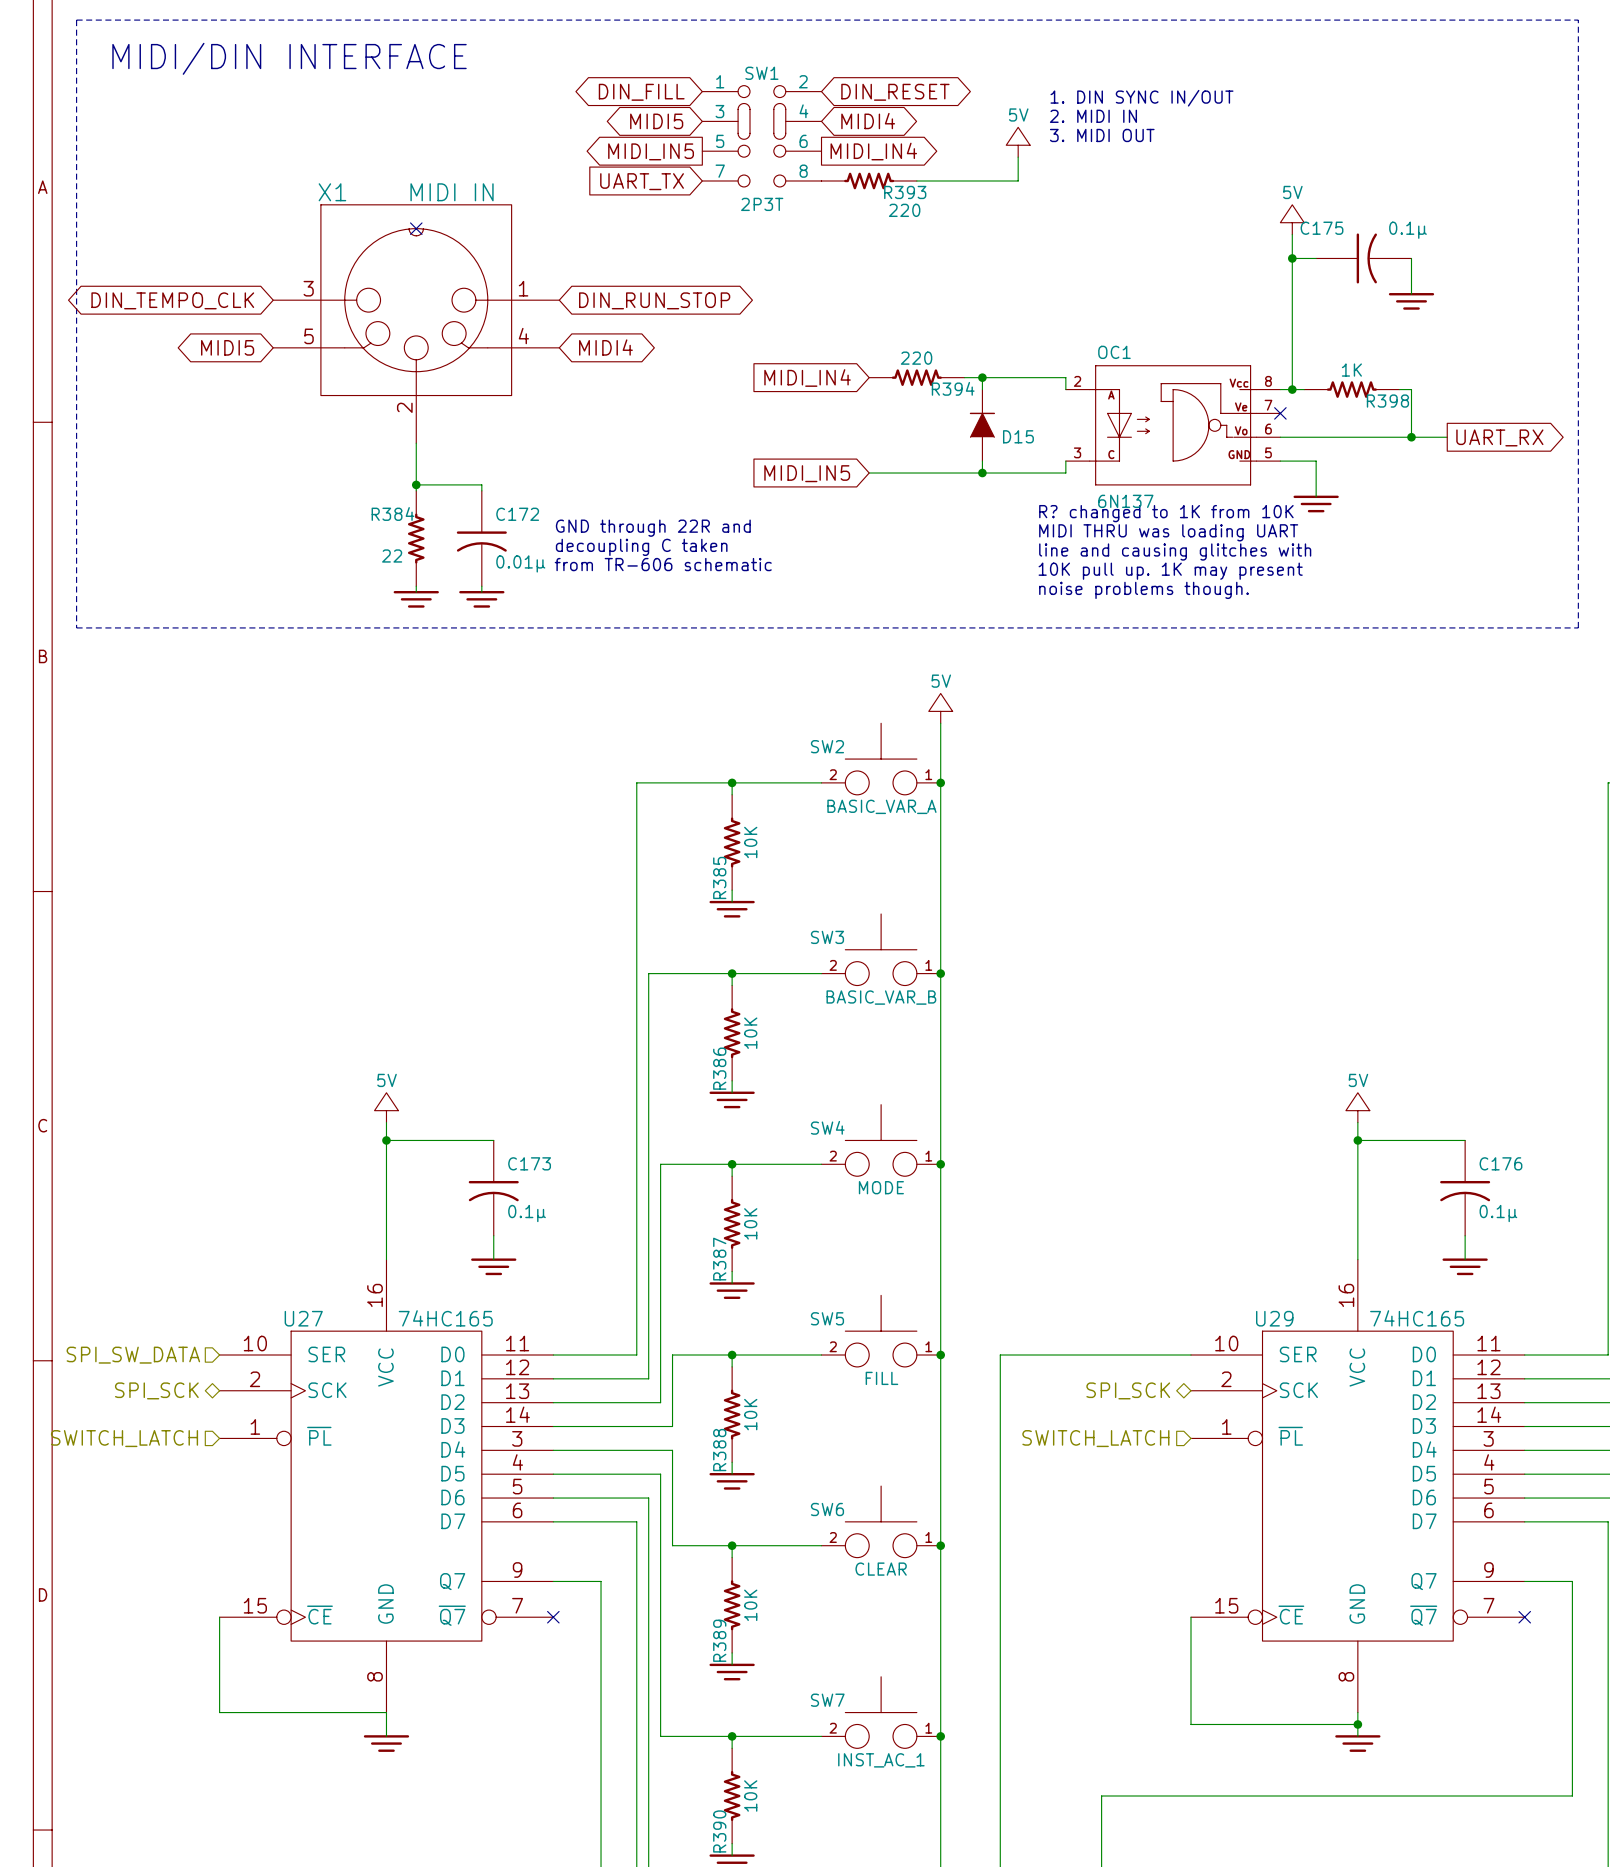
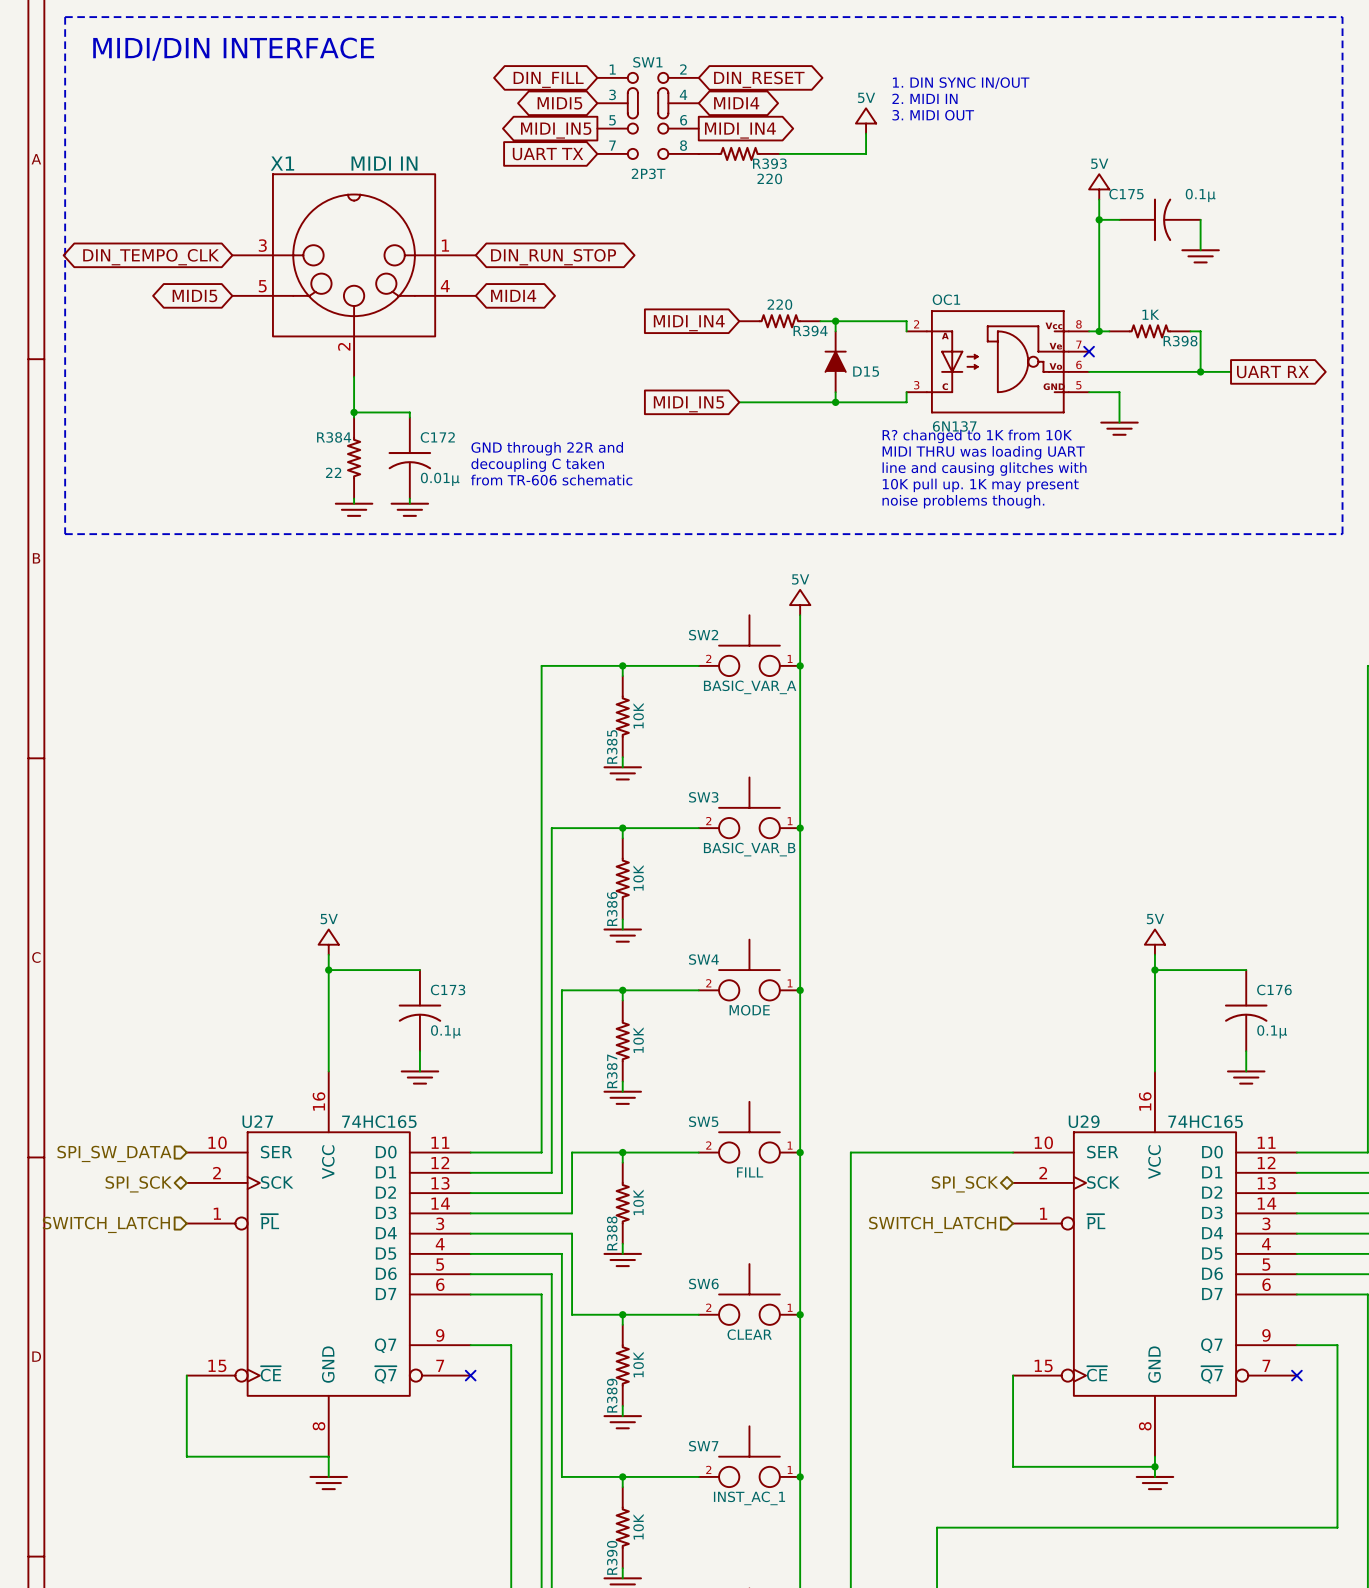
global label: UART_TX (642, 181) -> UART TX (547, 154)
no-connect mark: (416, 228) -> none
global label: UART_RX (1499, 437) -> UART RX (1272, 372)

